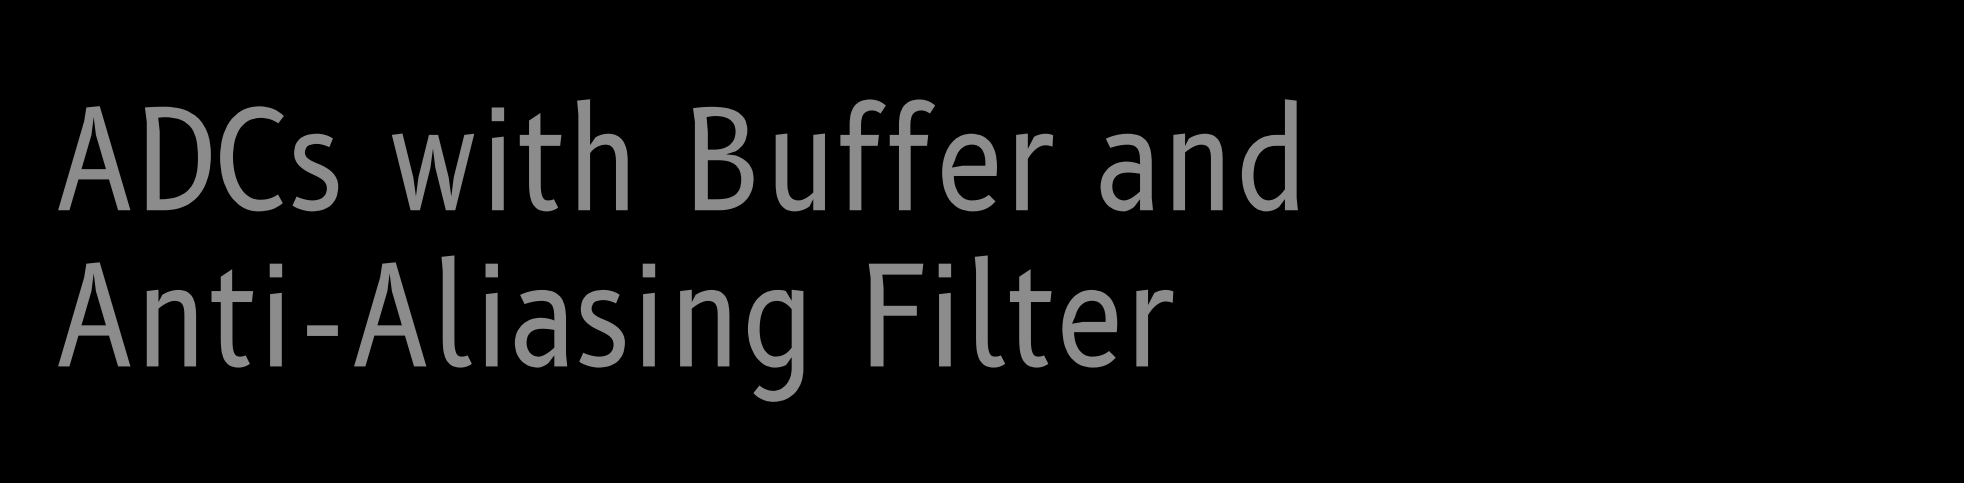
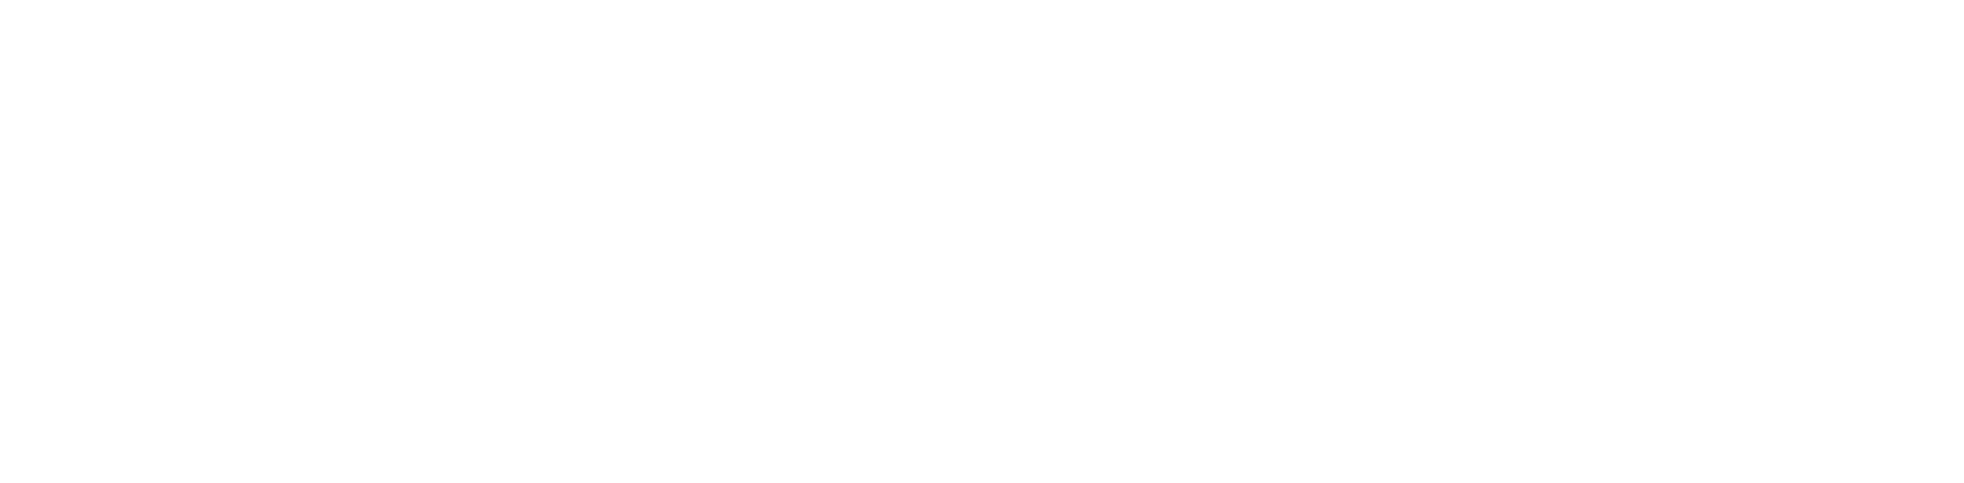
text: ADCs with Buffer and (677, 155) -> none
text: Anti-Aliasing Filter (615, 328) -> none

